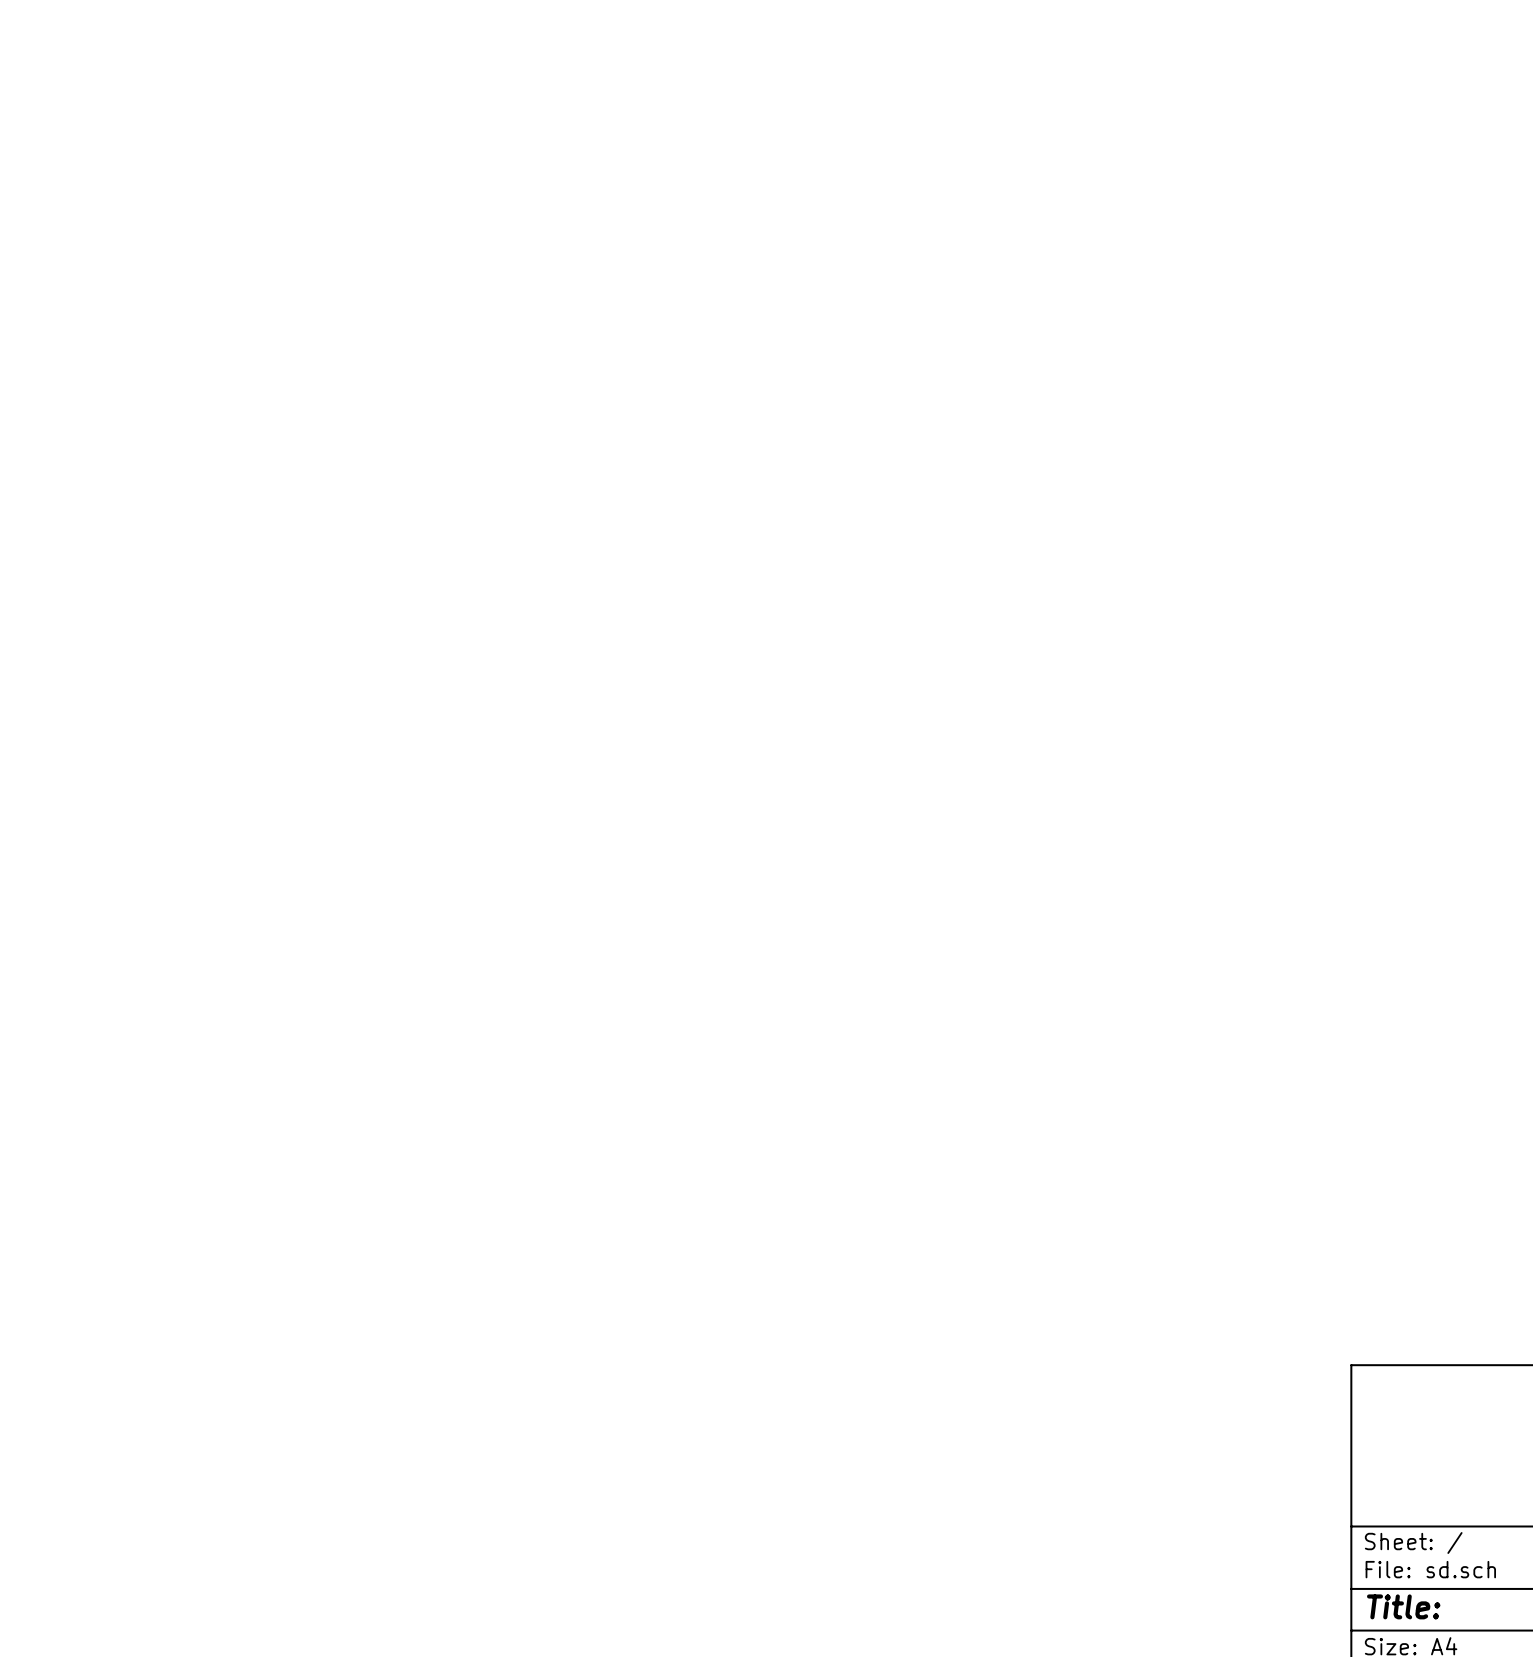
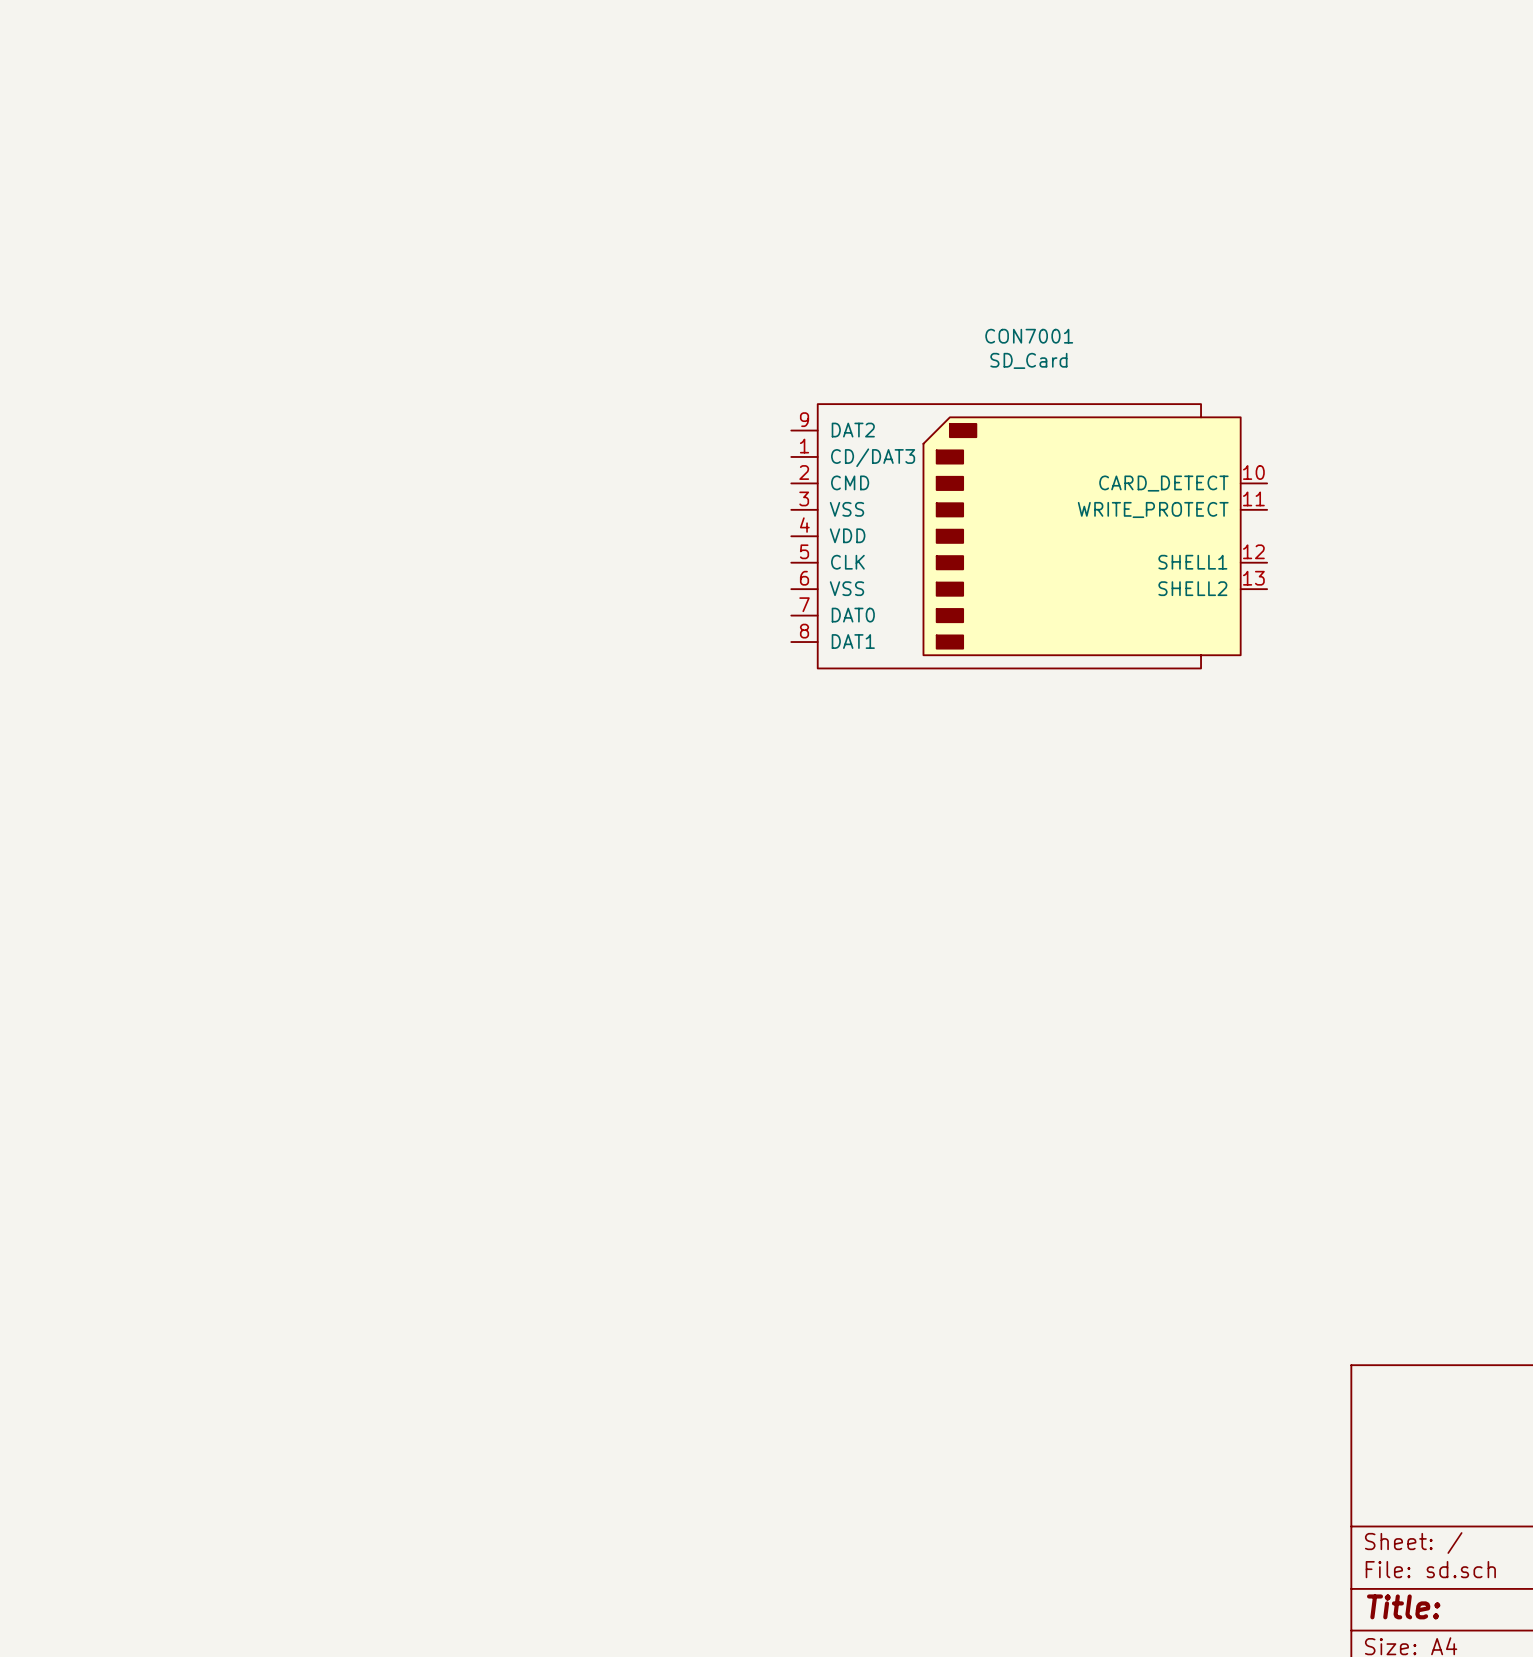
CON7001: none -> SD_Card (1029, 536)

